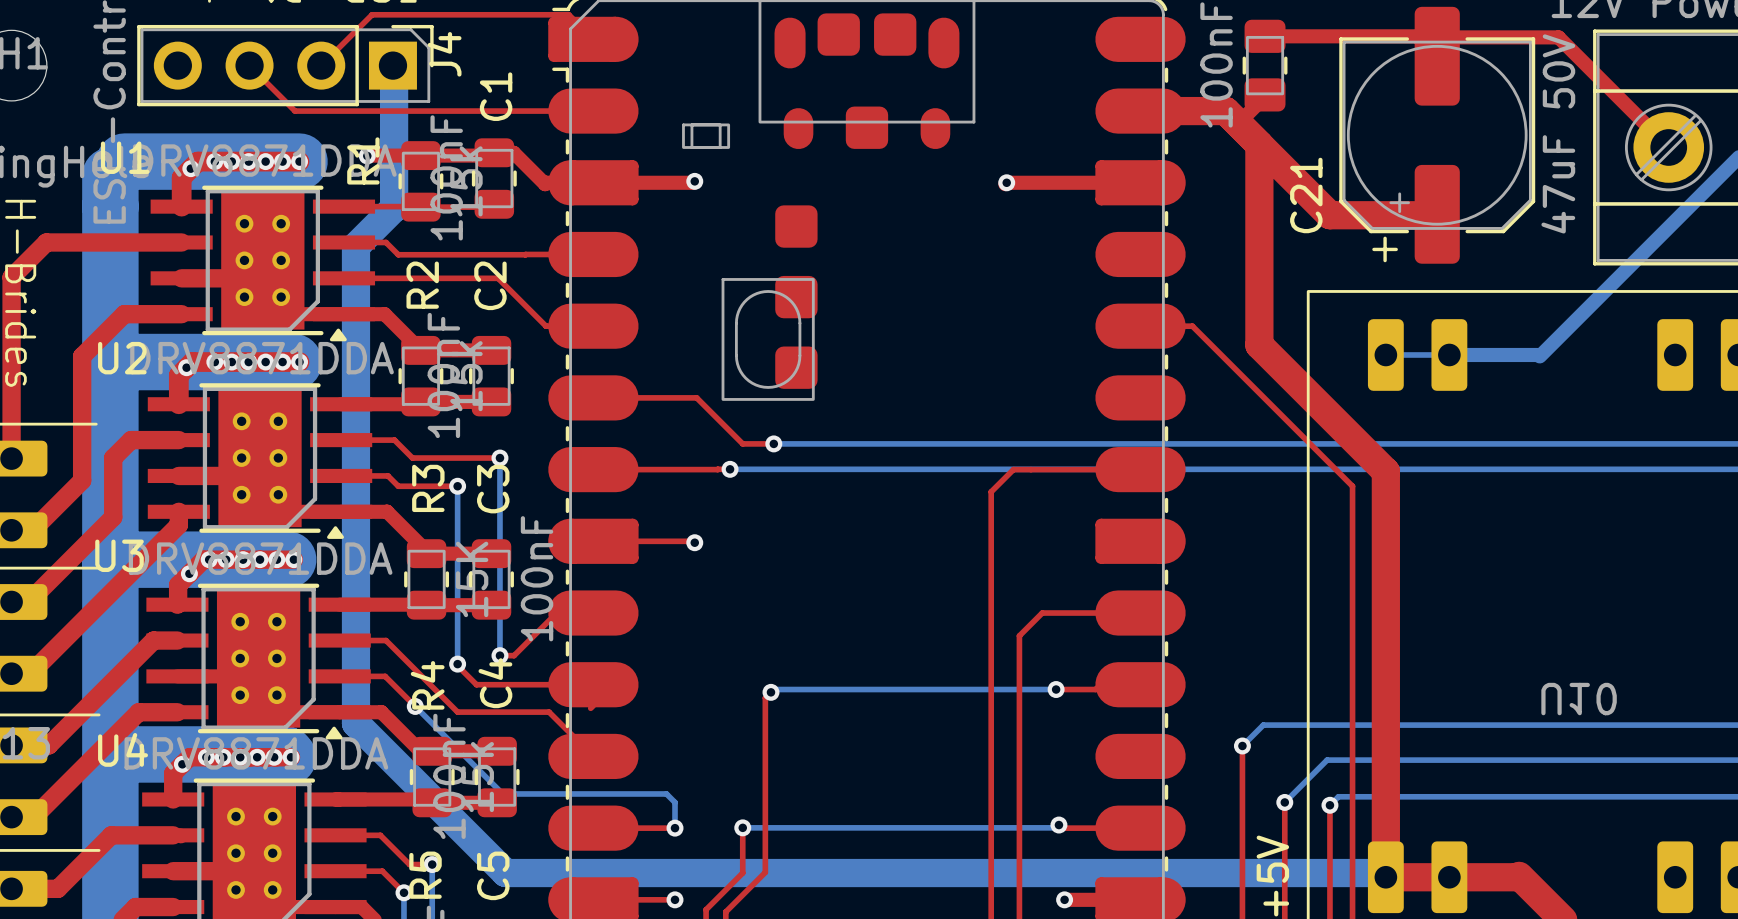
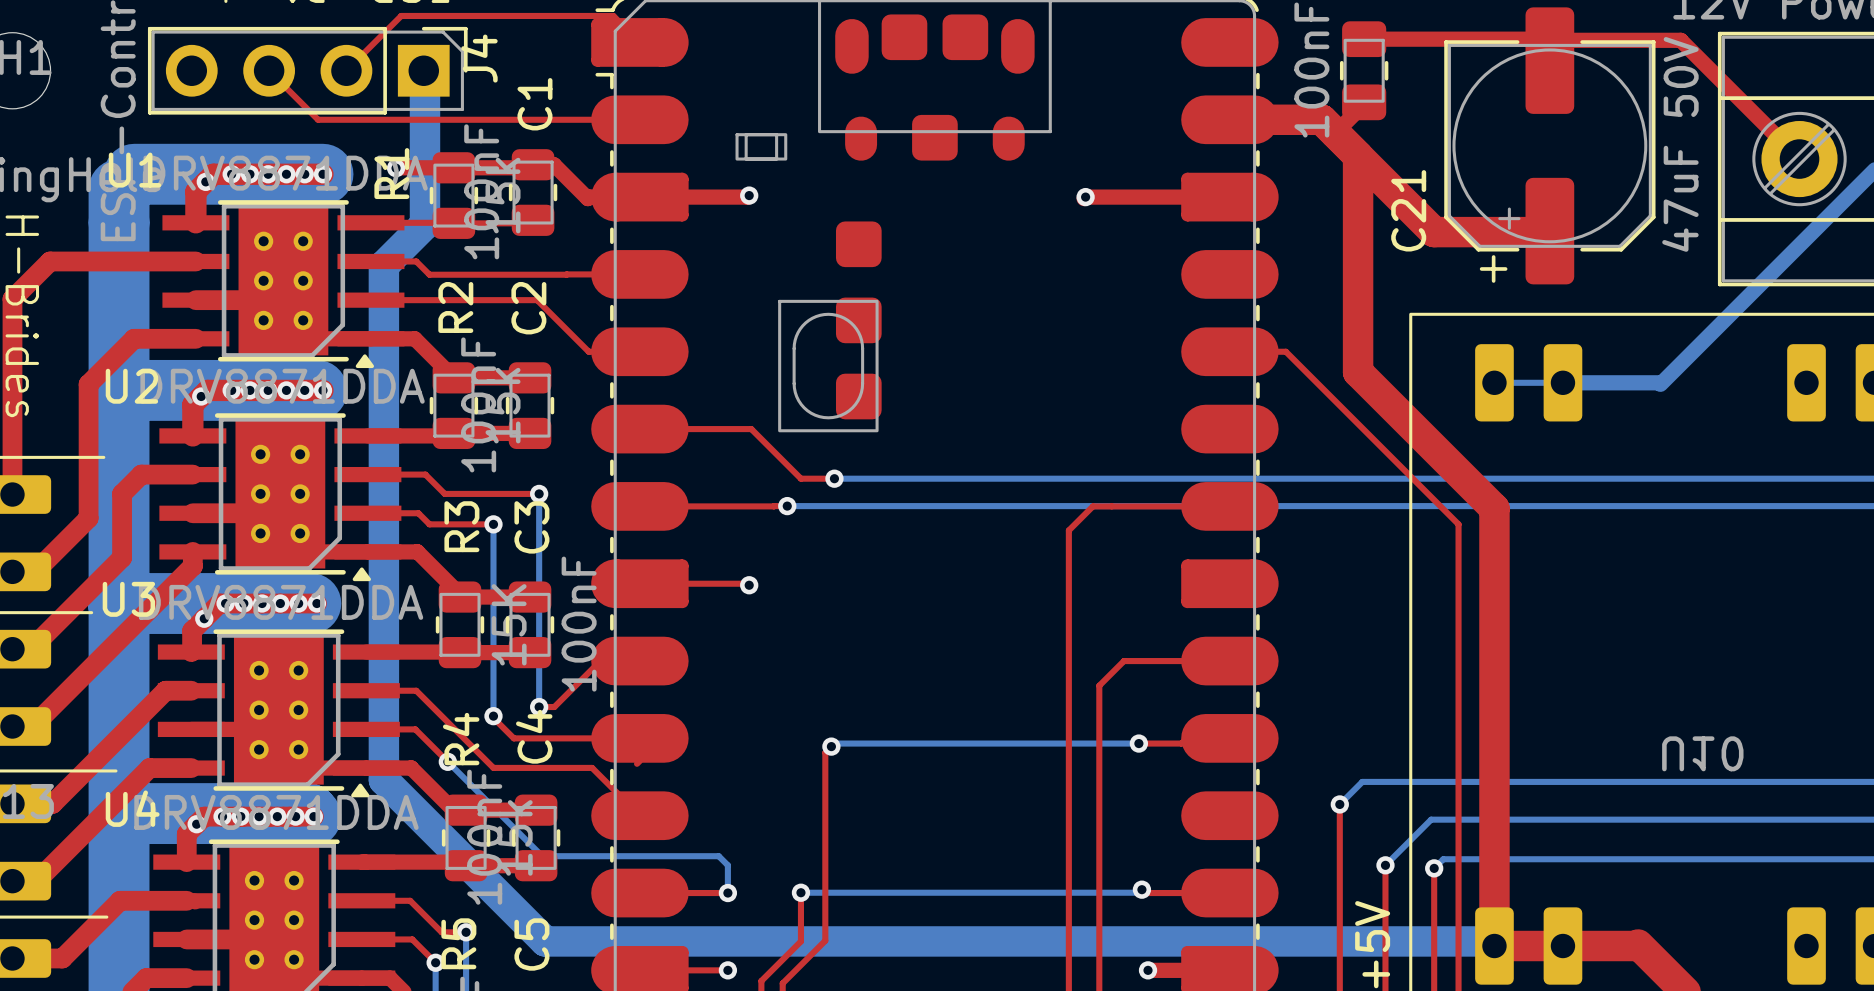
line: (84, 568) (99, 568) -> none
line: none -> (106, 770) (115, 770)

